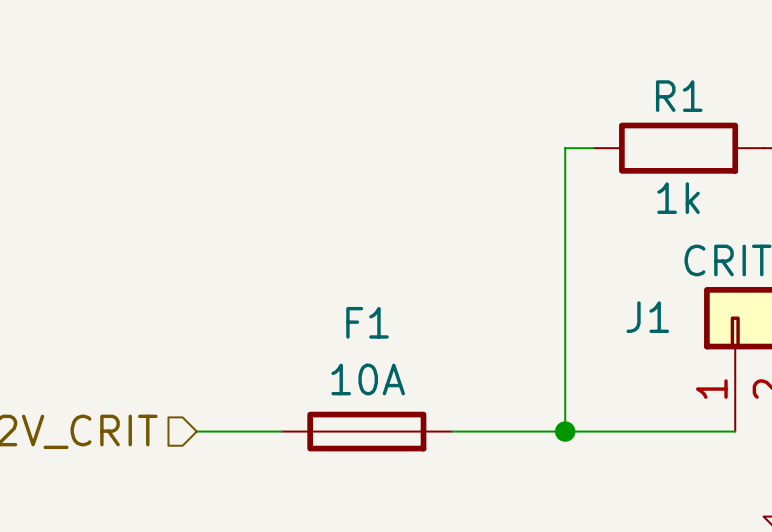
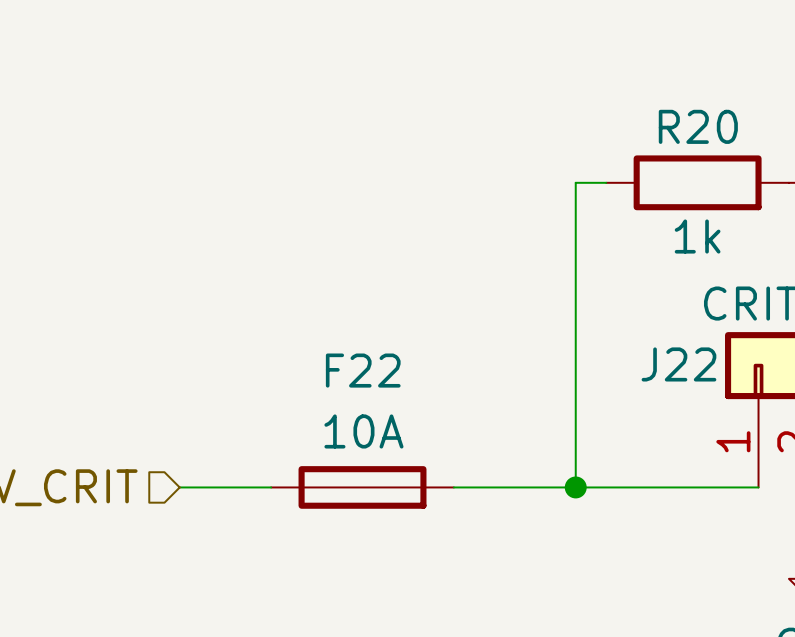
R1 name: R1 (679, 96) -> R20 (698, 126)
J1 name: J1 (647, 317) -> J22 (678, 364)
F1 name: F1 (367, 322) -> F22 (363, 370)

